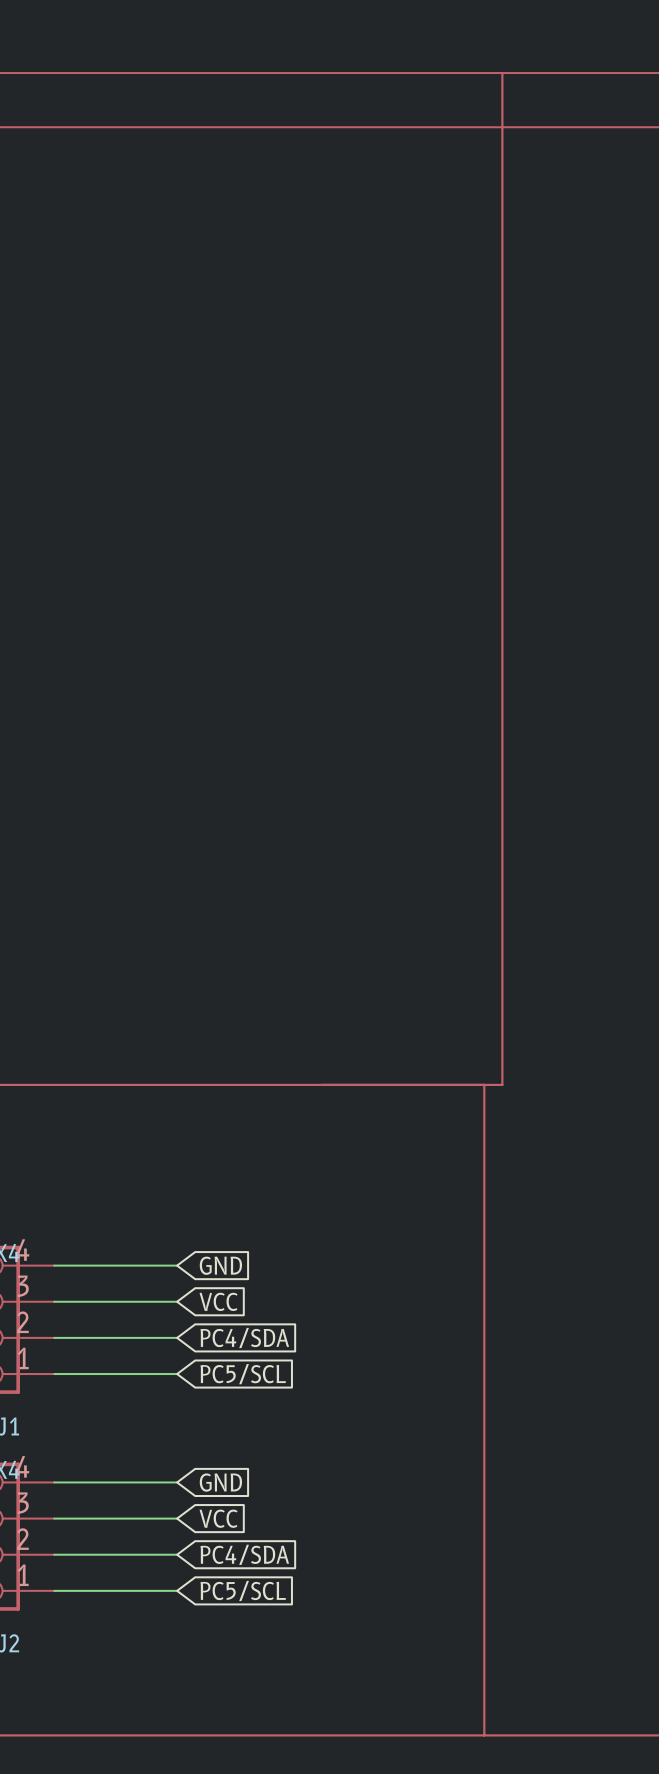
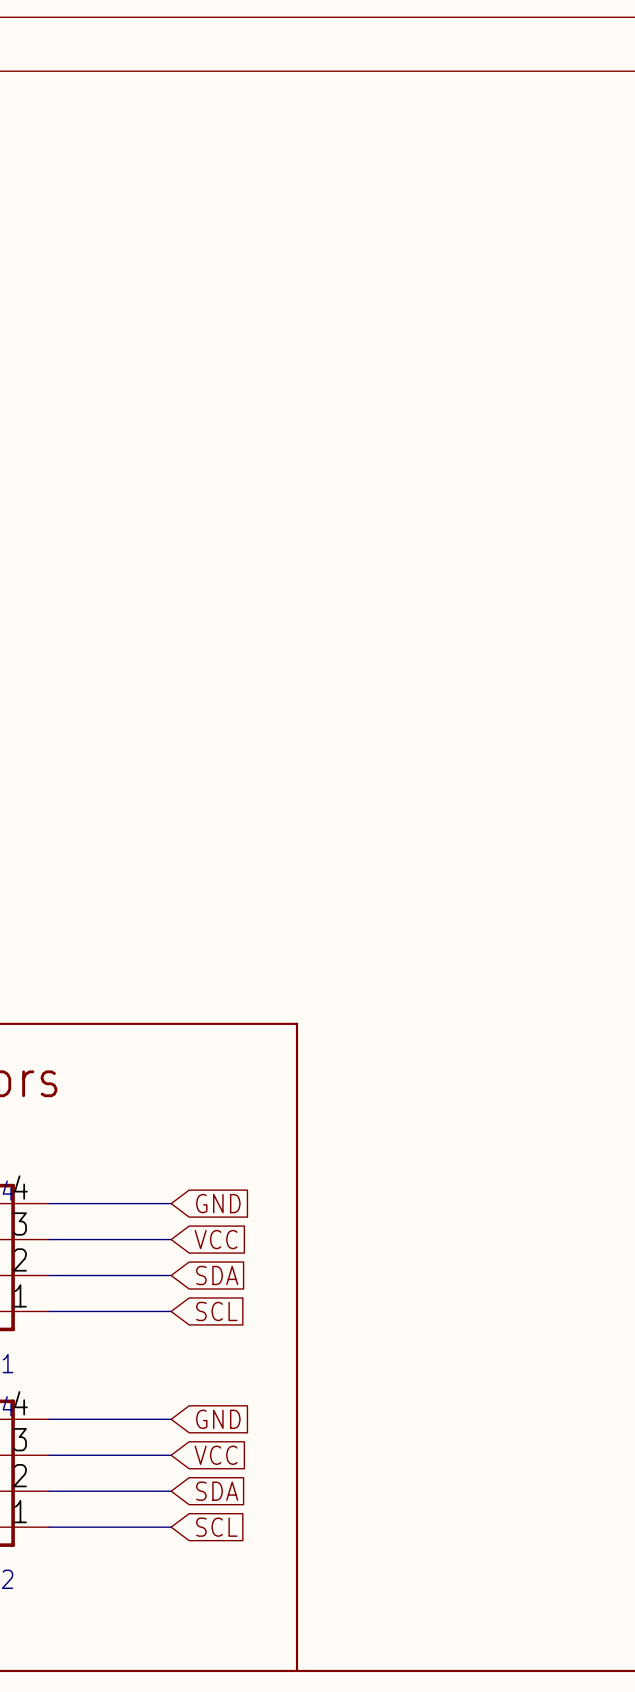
line: (502, 73) (502, 1084) (303, 1084) -> (297, 1670) (297, 1023)
line: (484, 1084) (484, 1735) -> none
global label: PC4/SDA (244, 1338) -> SDA (217, 1275)
global label: PC5/SCL (243, 1374) -> SCL (216, 1311)
global label: PC4/SDA (244, 1554) -> SDA (217, 1491)
global label: PC5/SCL (243, 1590) -> SCL (216, 1527)

